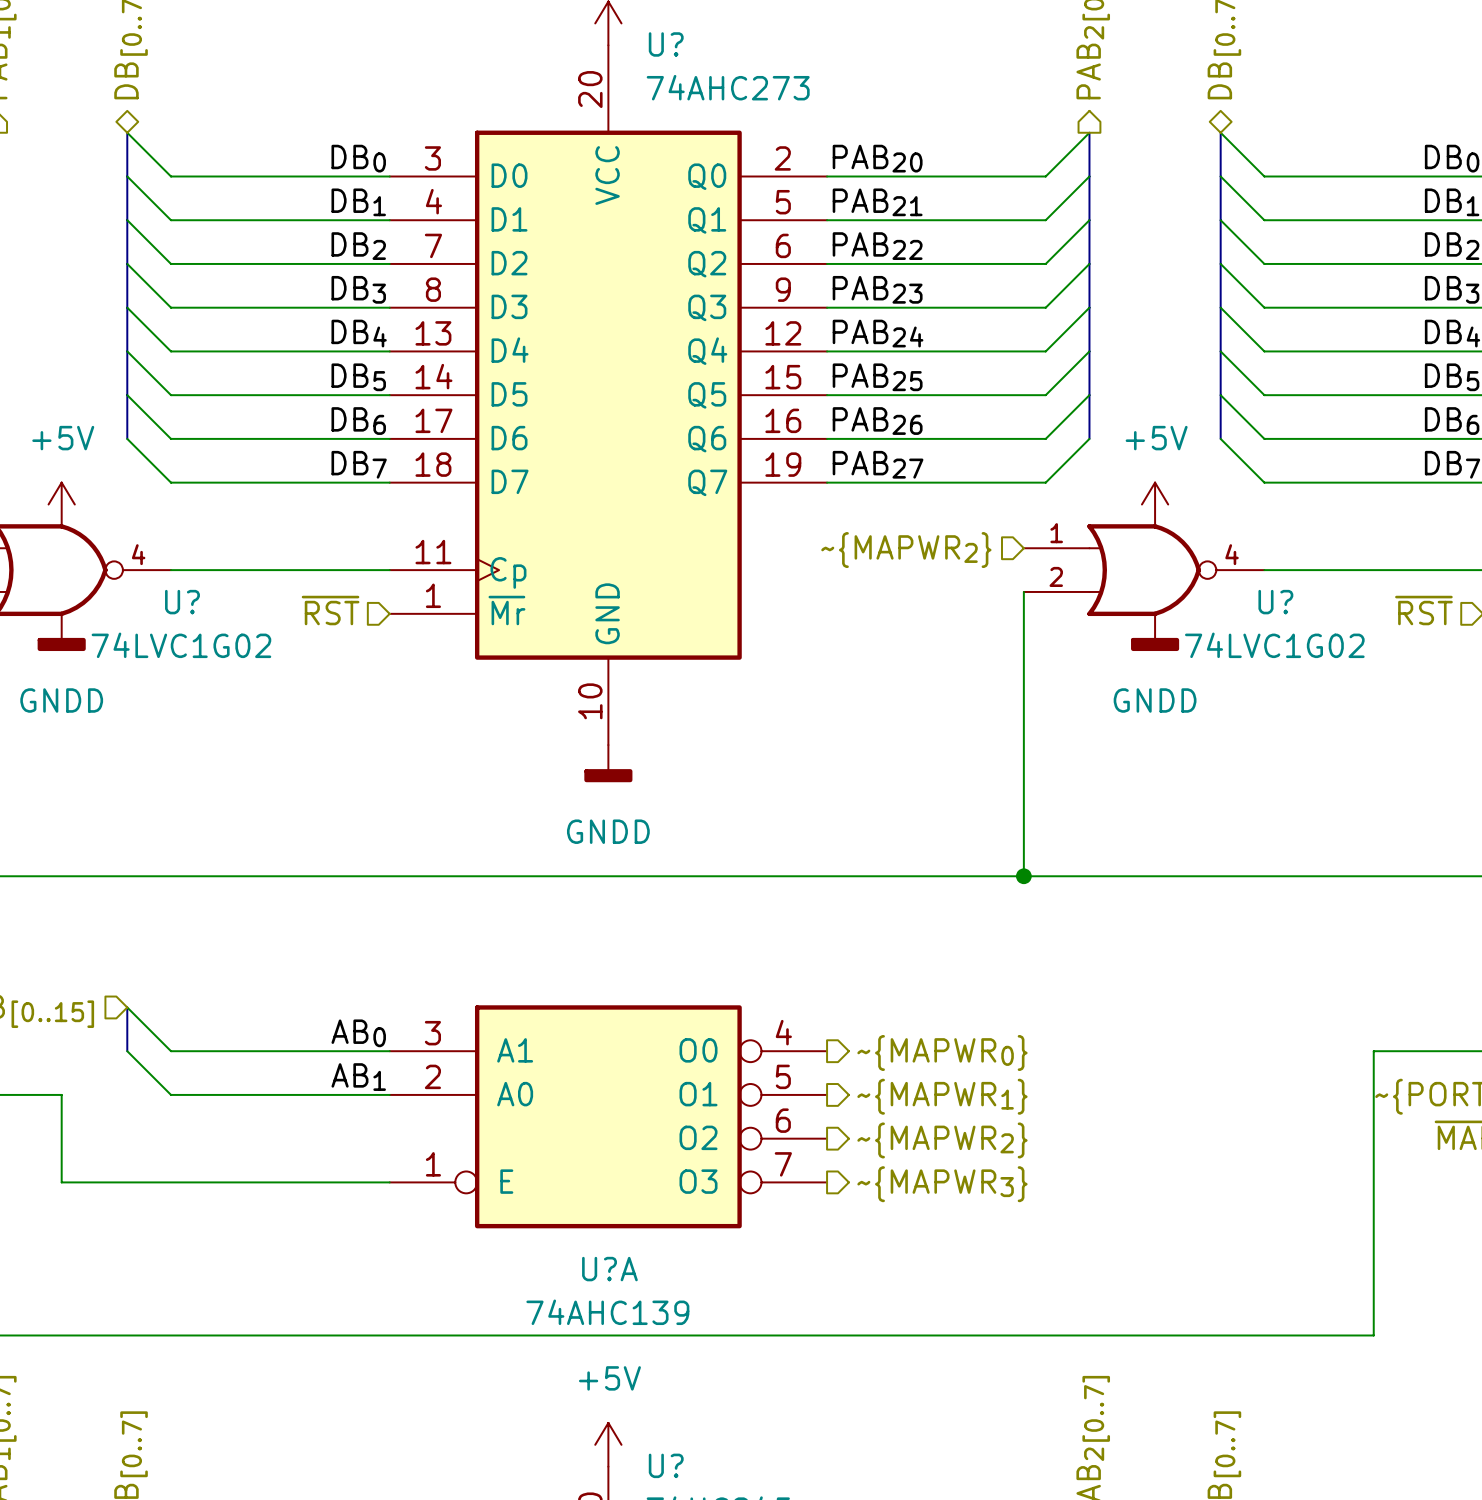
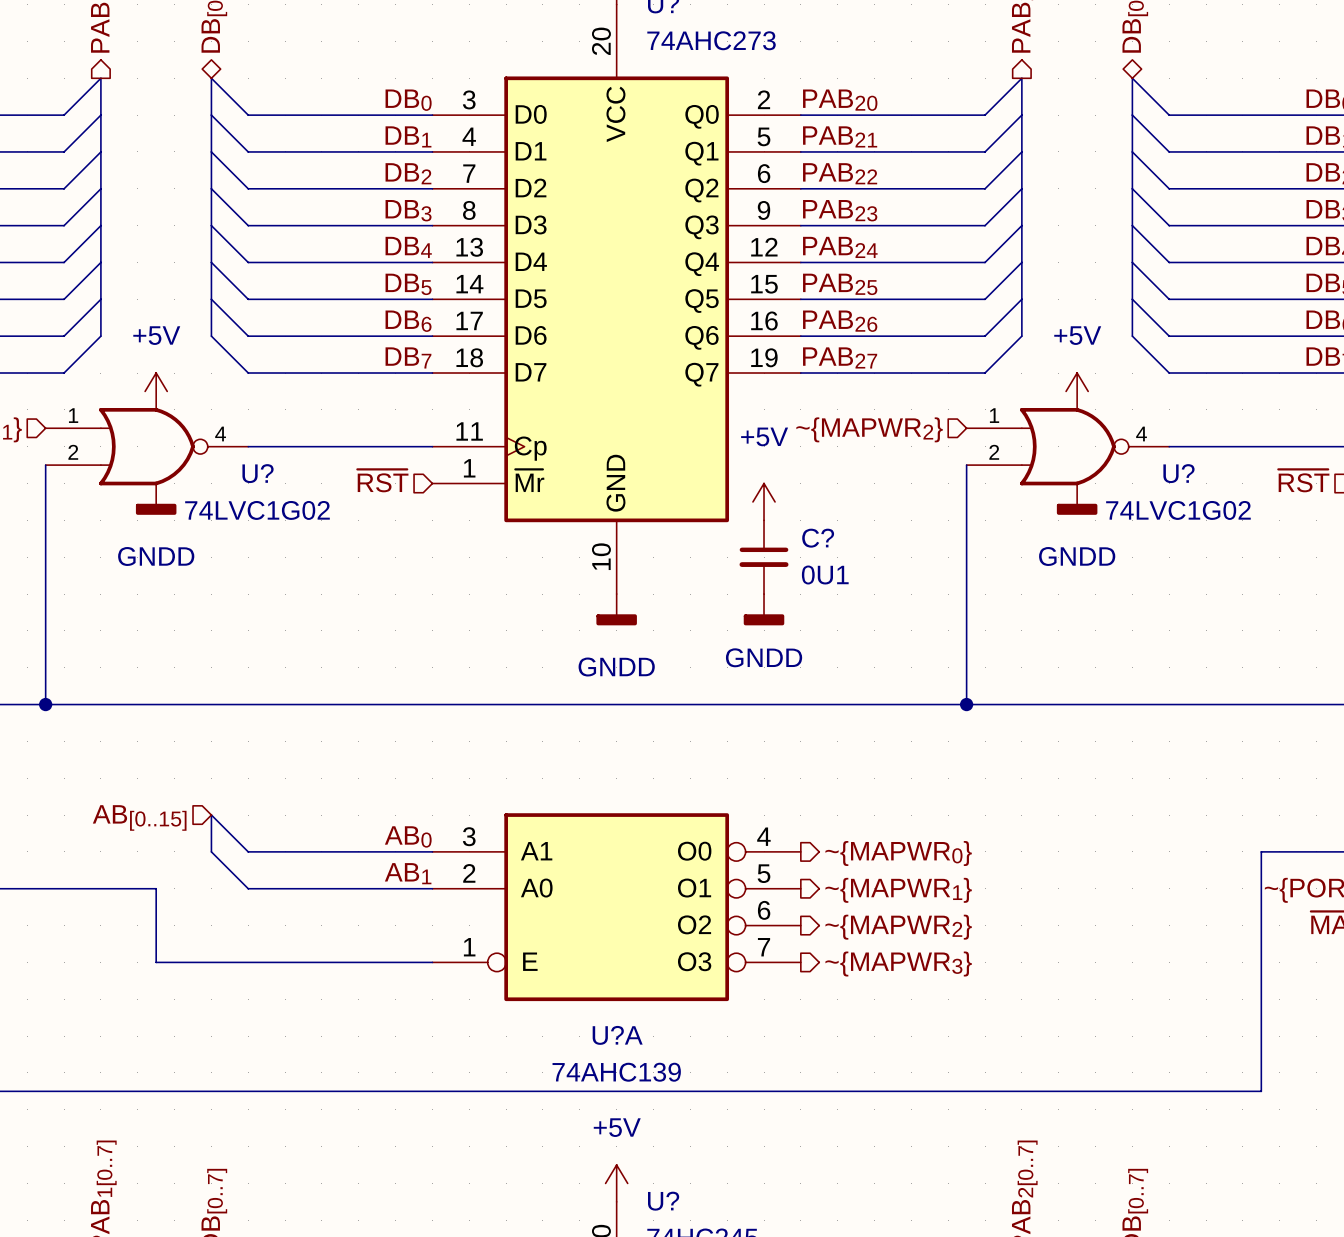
power symbol: none -> +5V (764, 501)
C?: none -> 0U1 (764, 557)
power symbol: none -> GNDD (764, 609)

